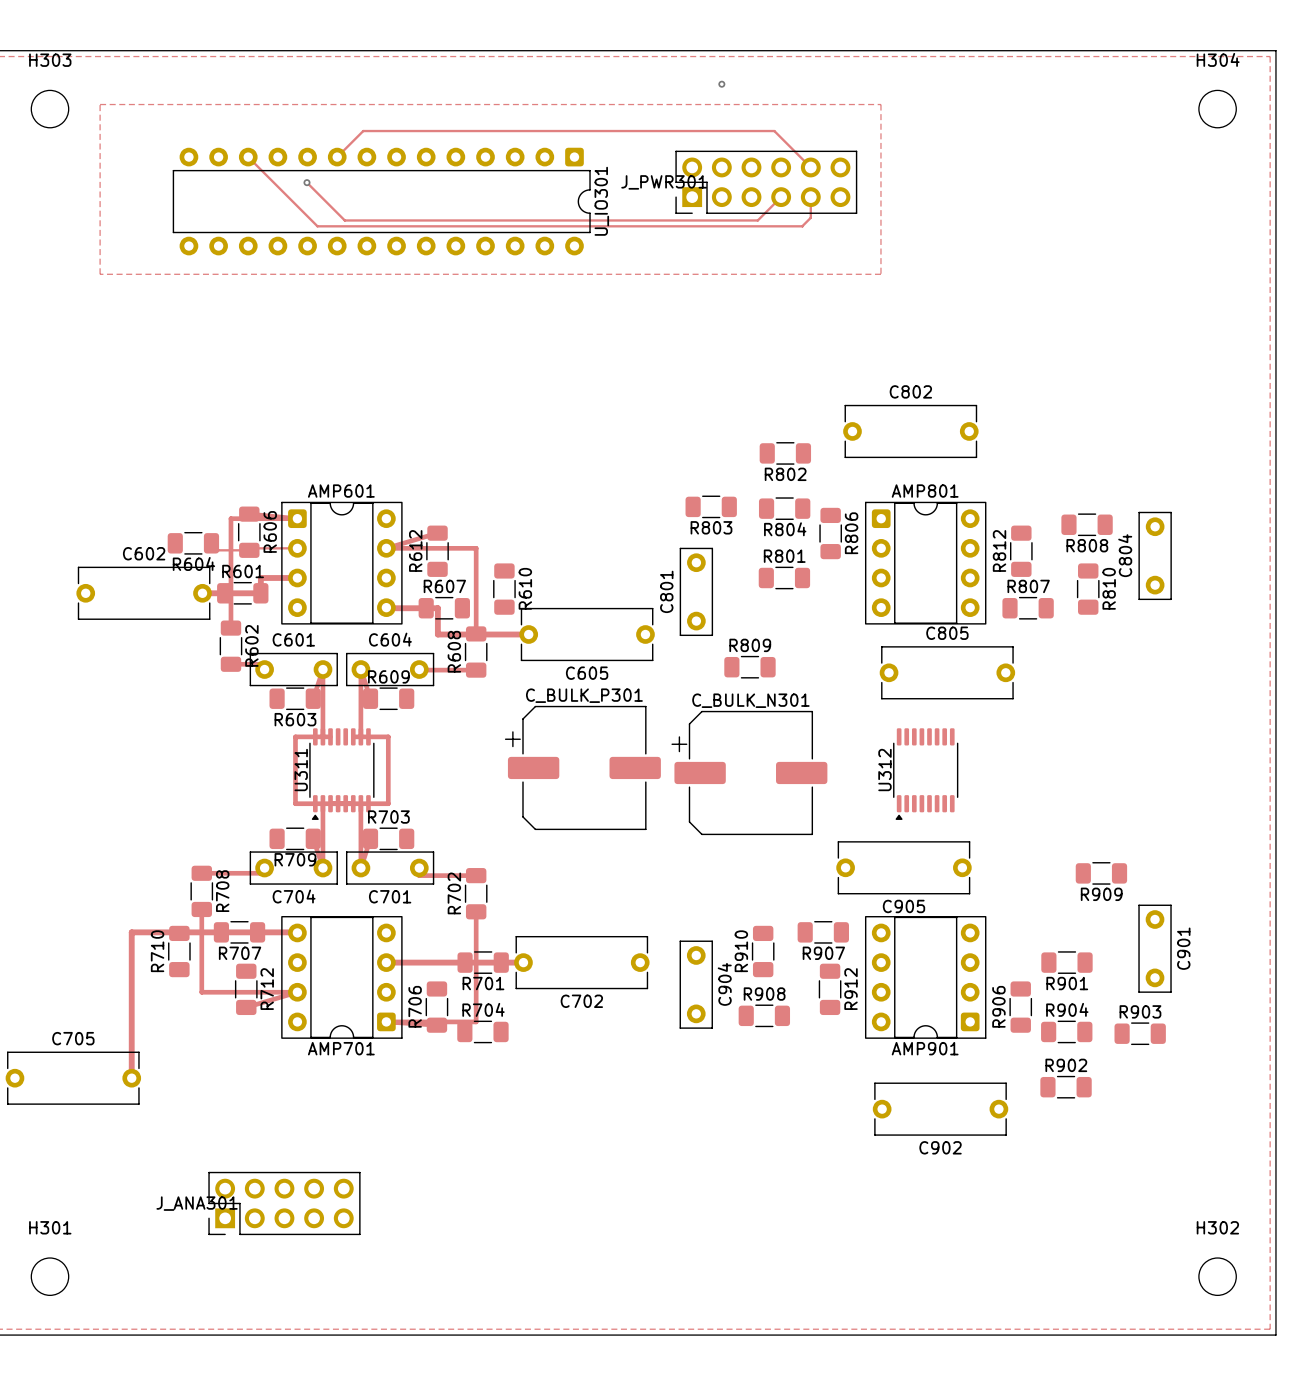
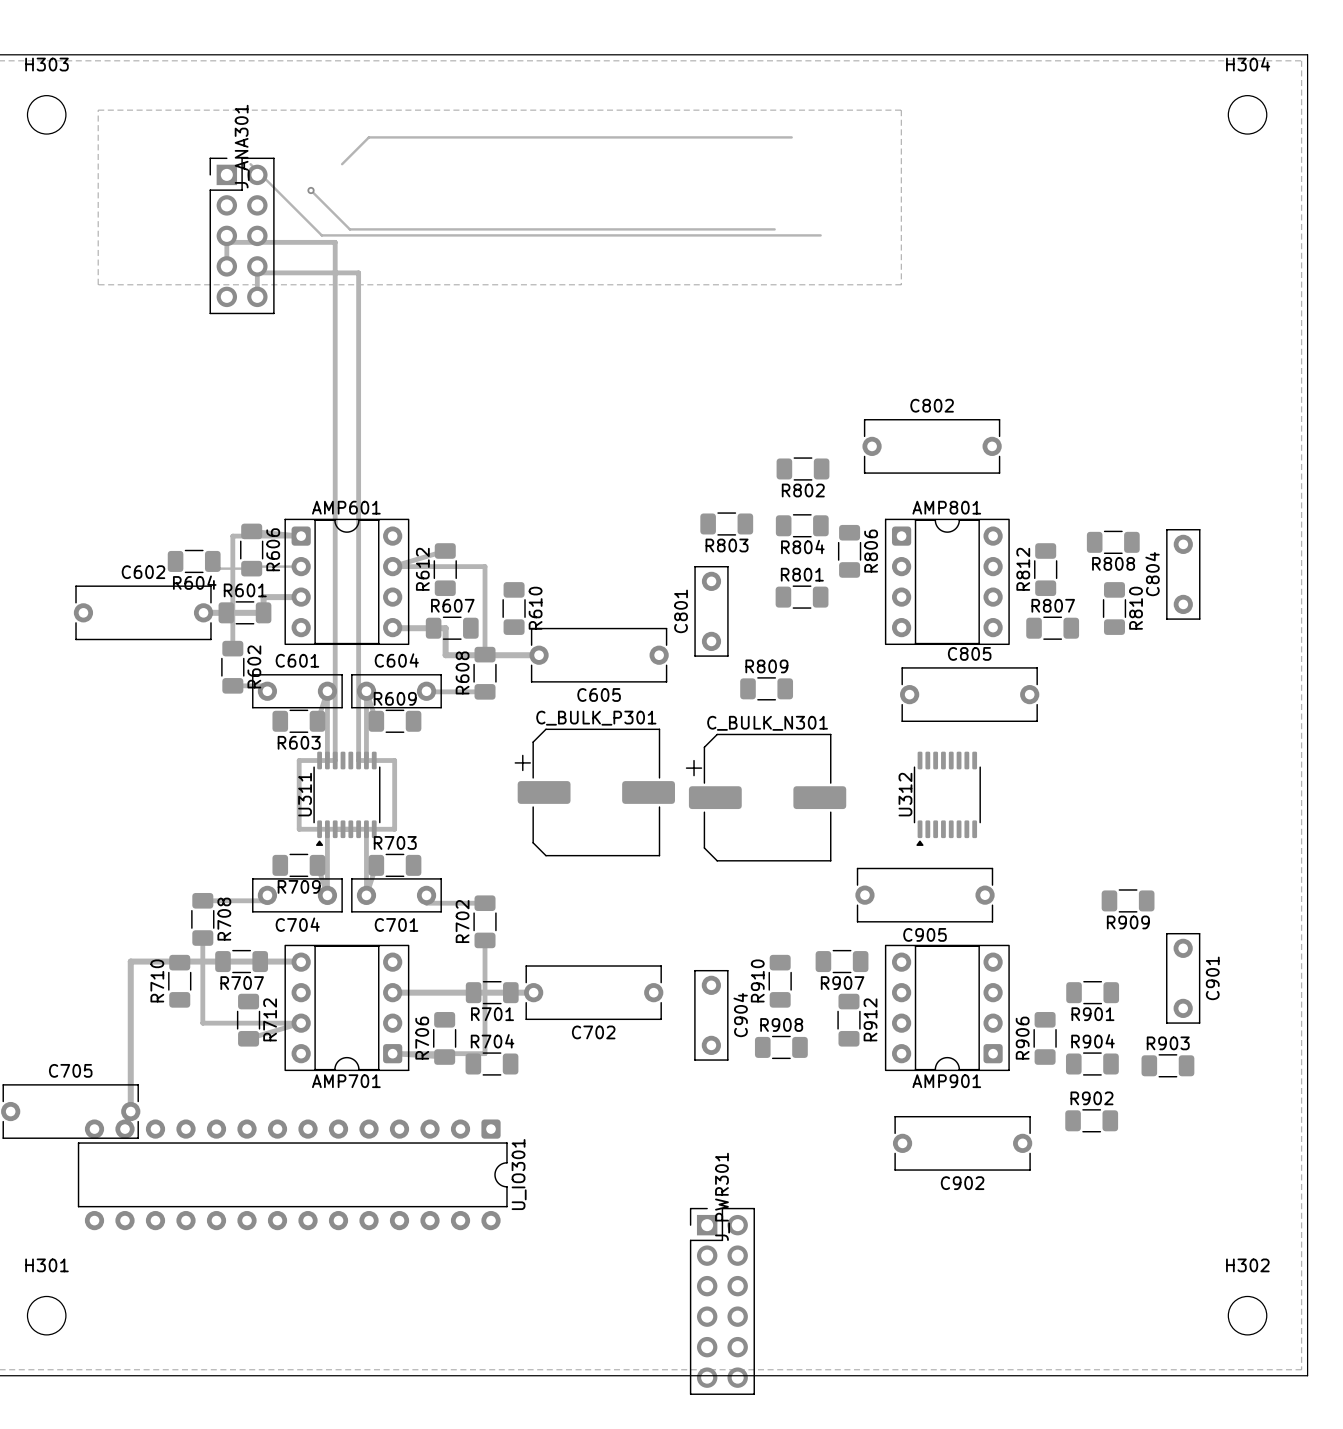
via: (721, 84) -> none
track: (774, 131) (810, 167) -> none
J_PWR301 rotation: 0° (766, 182) -> 90° clockwise (722, 1301)
J_PWR301 position: (766, 182) -> (722, 1301)
track: (781, 197) (757, 220) -> none
track: (810, 197) (810, 217) (802, 226) -> none
U_IO301 position: (381, 201) -> (292, 1174)
track: none -> (226, 266) (226, 242) (335, 242) (335, 760)
track: none -> (257, 296) (257, 272) (358, 272) (358, 760)
J_ANA301 rotation: 0° (284, 1203) -> 90° clockwise (242, 235)
J_ANA301 position: (284, 1203) -> (242, 235)

